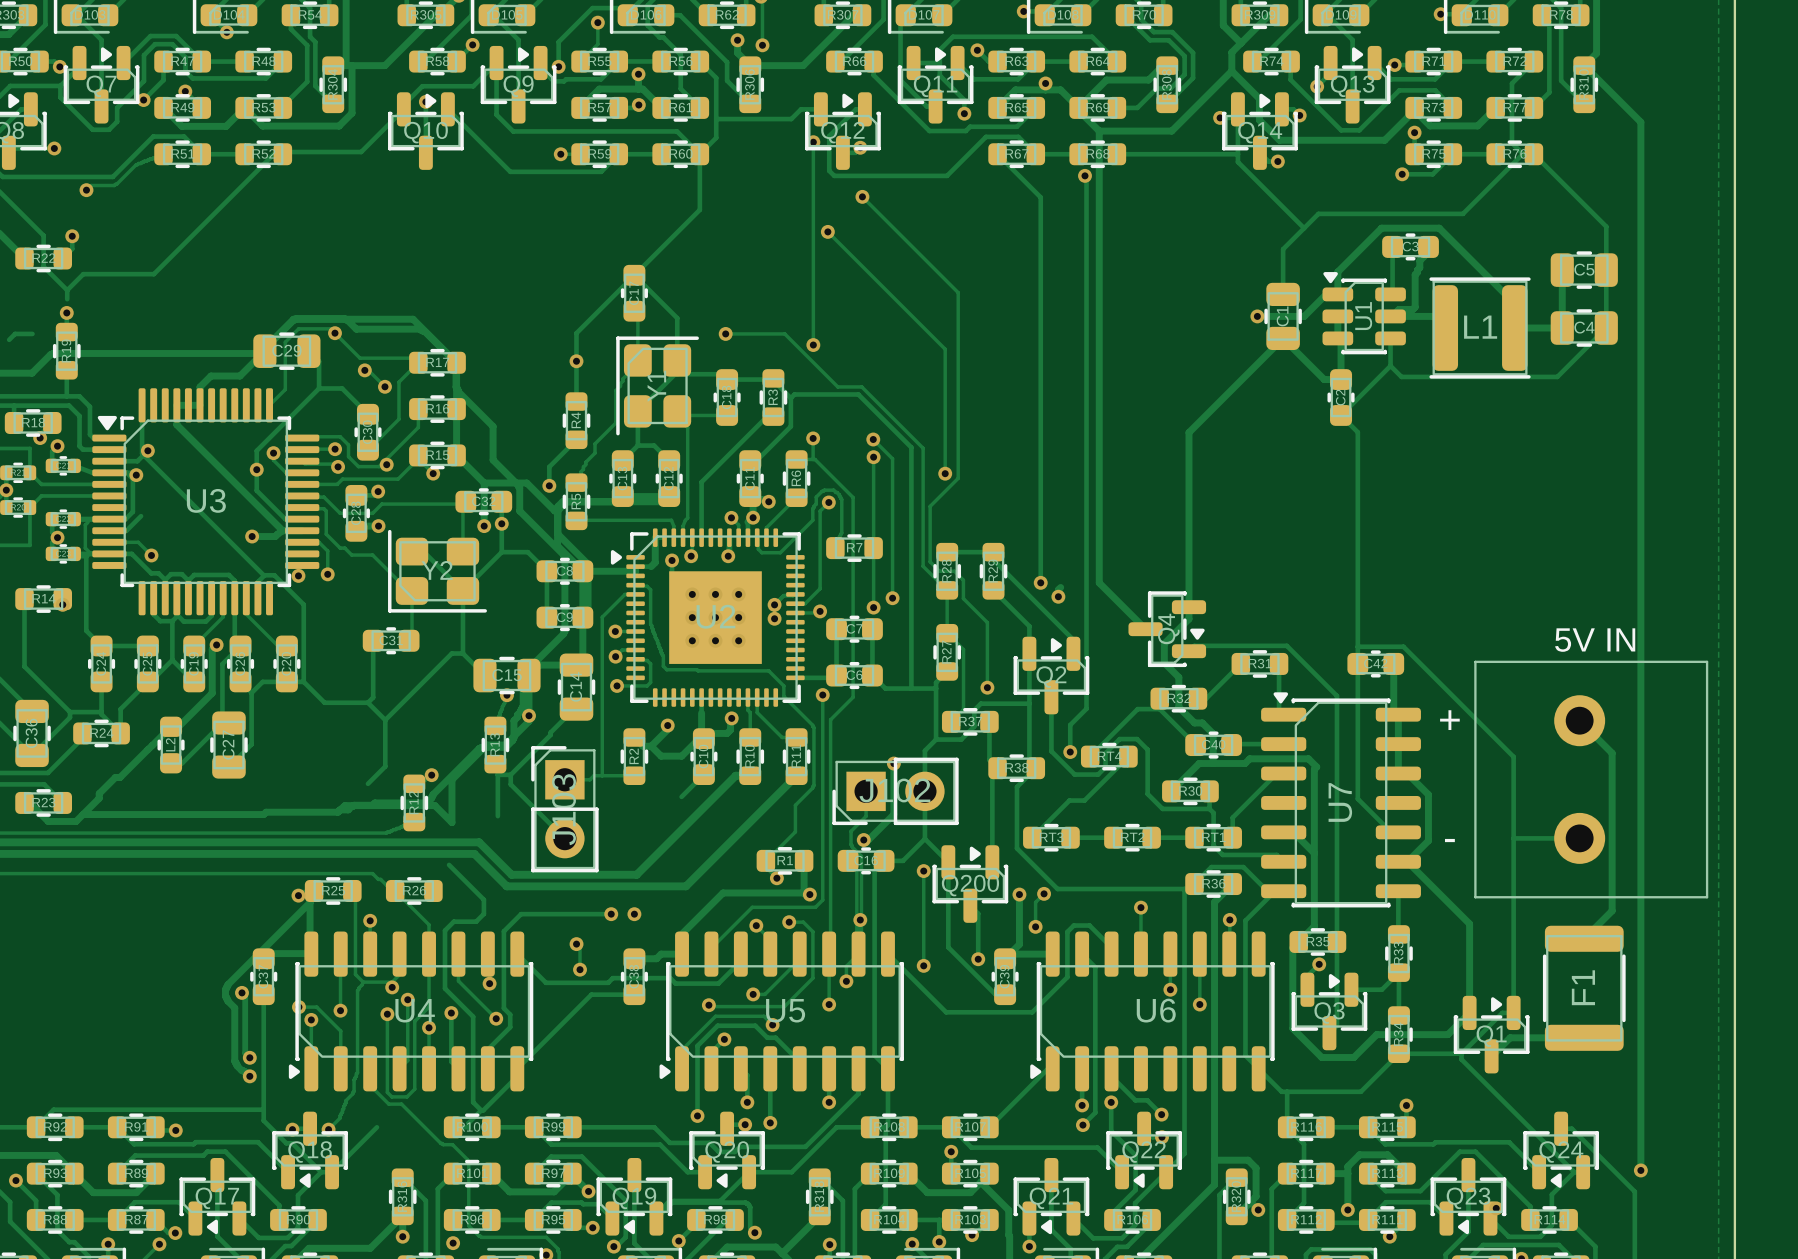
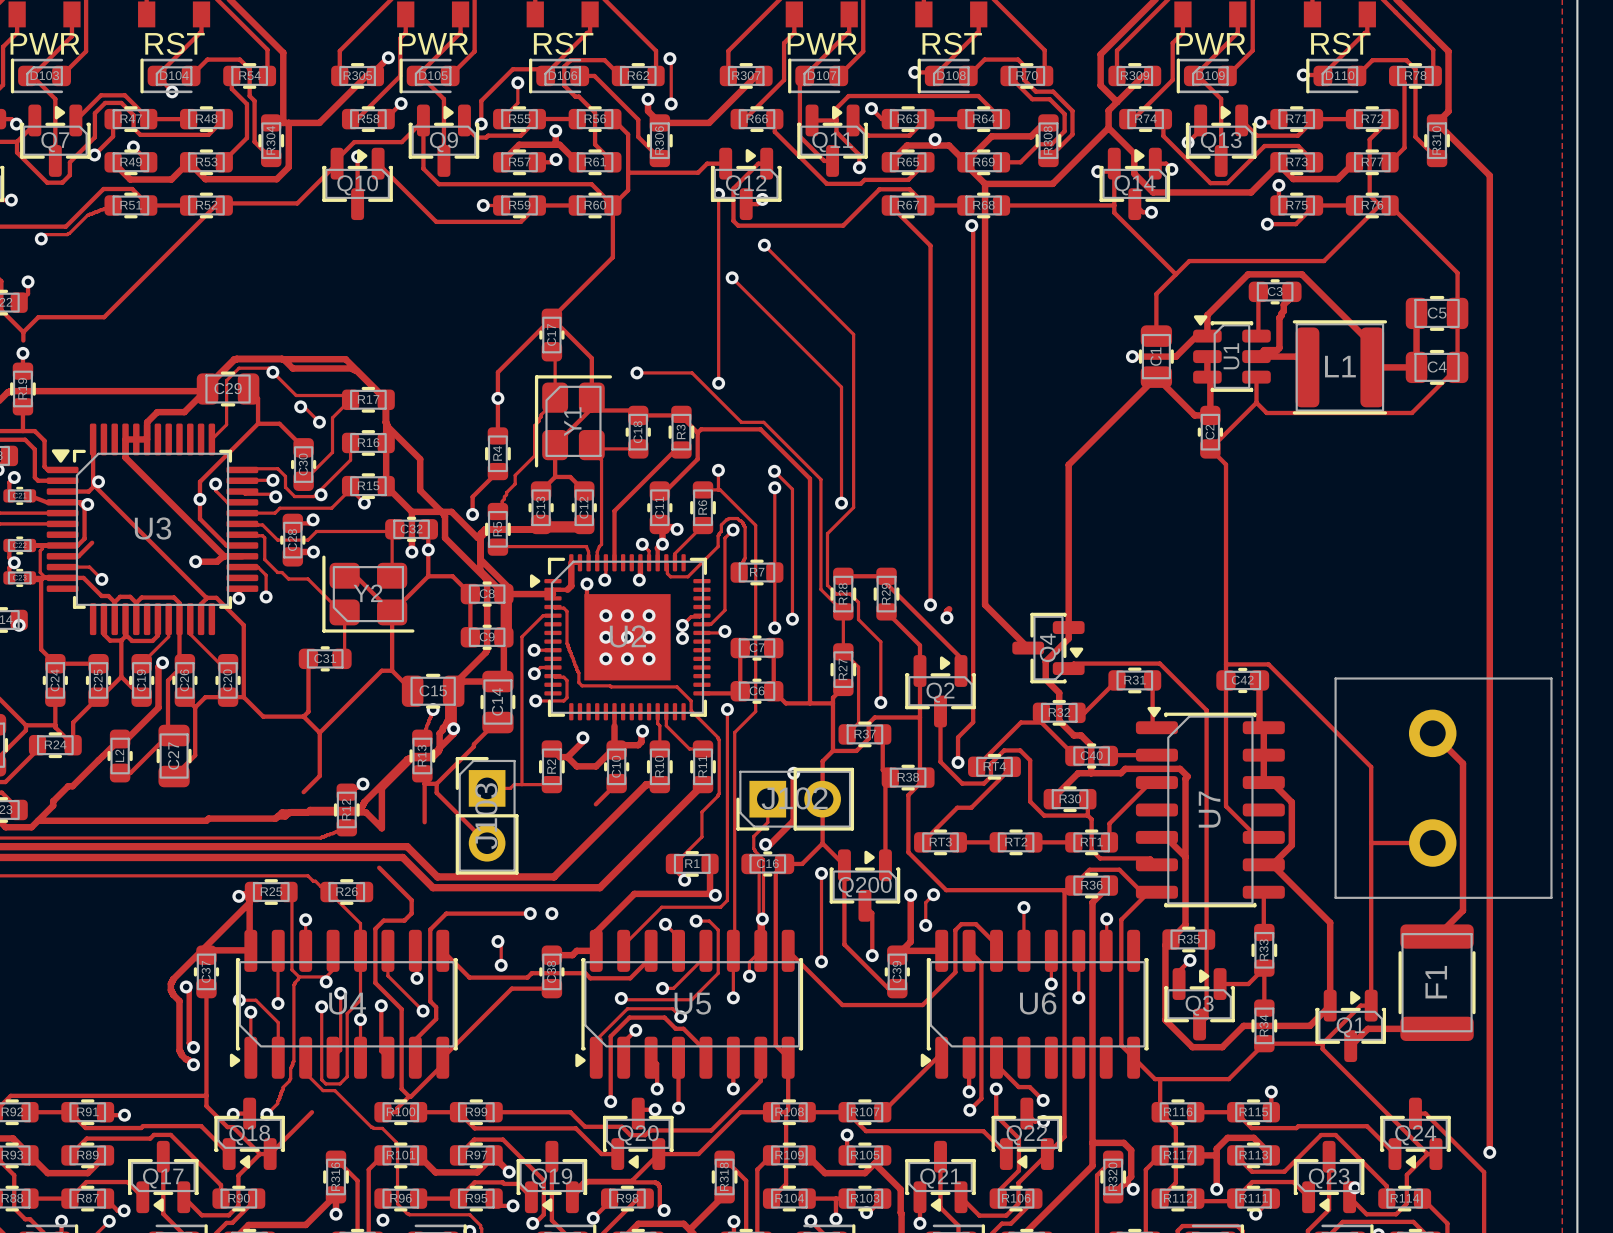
text: 5V IN (1595, 640) -> none
text: + (1449, 720) -> none
text: - (1449, 840) -> none

